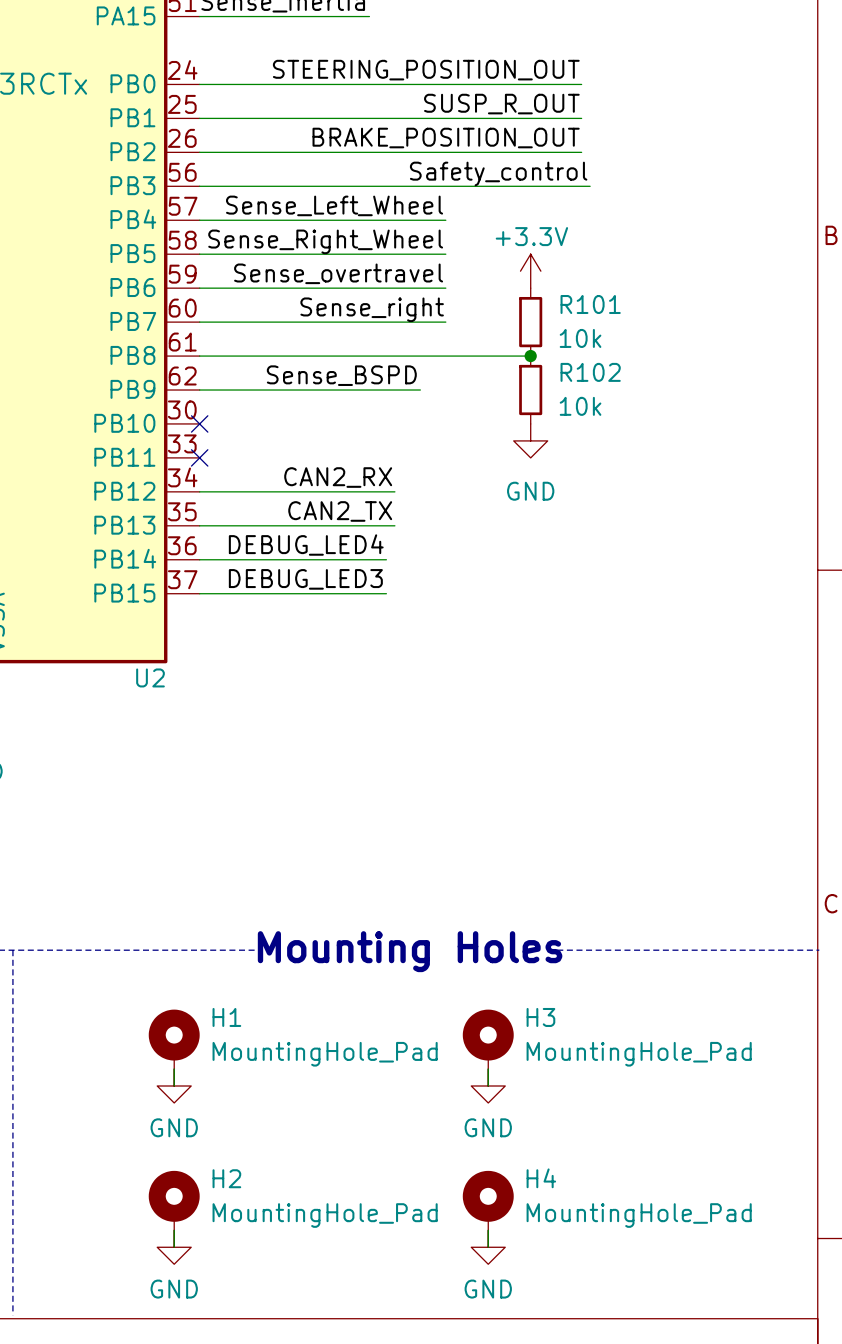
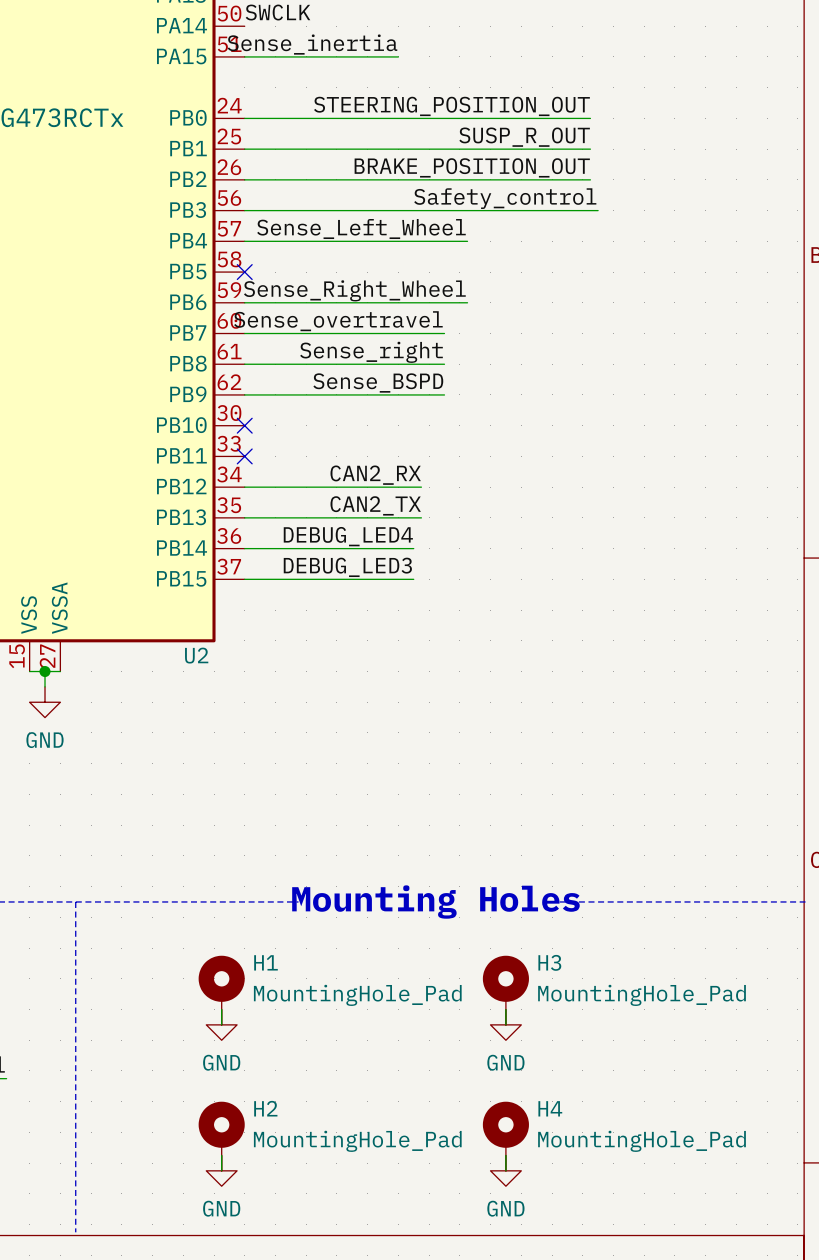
label: Sense_Right_Wheel (325, 241) -> none
wire: (199, 254) (445, 254) -> none
no-connect mark: none -> (244, 272)
power symbol: +3.3V (530, 271) -> none
label: Sense_overtravel (338, 273) -> Sense_Right_Wheel (354, 290)
label: none -> Sense_overtravel (338, 321)
label position: Sense_right (372, 309) -> Sense_right (371, 352)
wire: (420, 322) (445, 322) -> none
R101: 10k (530, 322) -> none
wire: (420, 356) (530, 356) -> none
junction: (530, 356) -> none
R102: 10k (530, 390) -> none
power symbol: GND (530, 440) -> none

